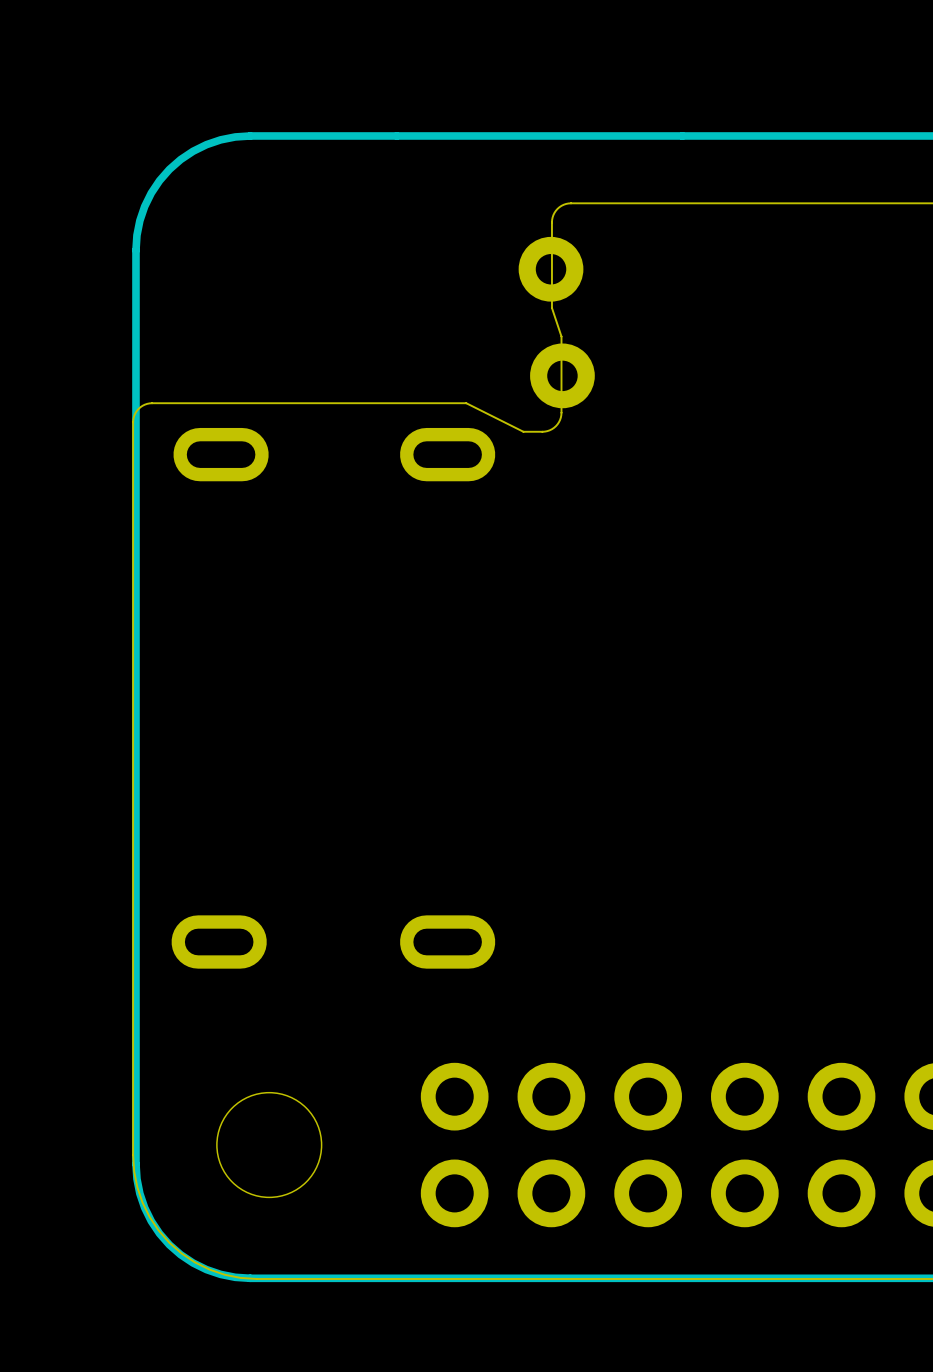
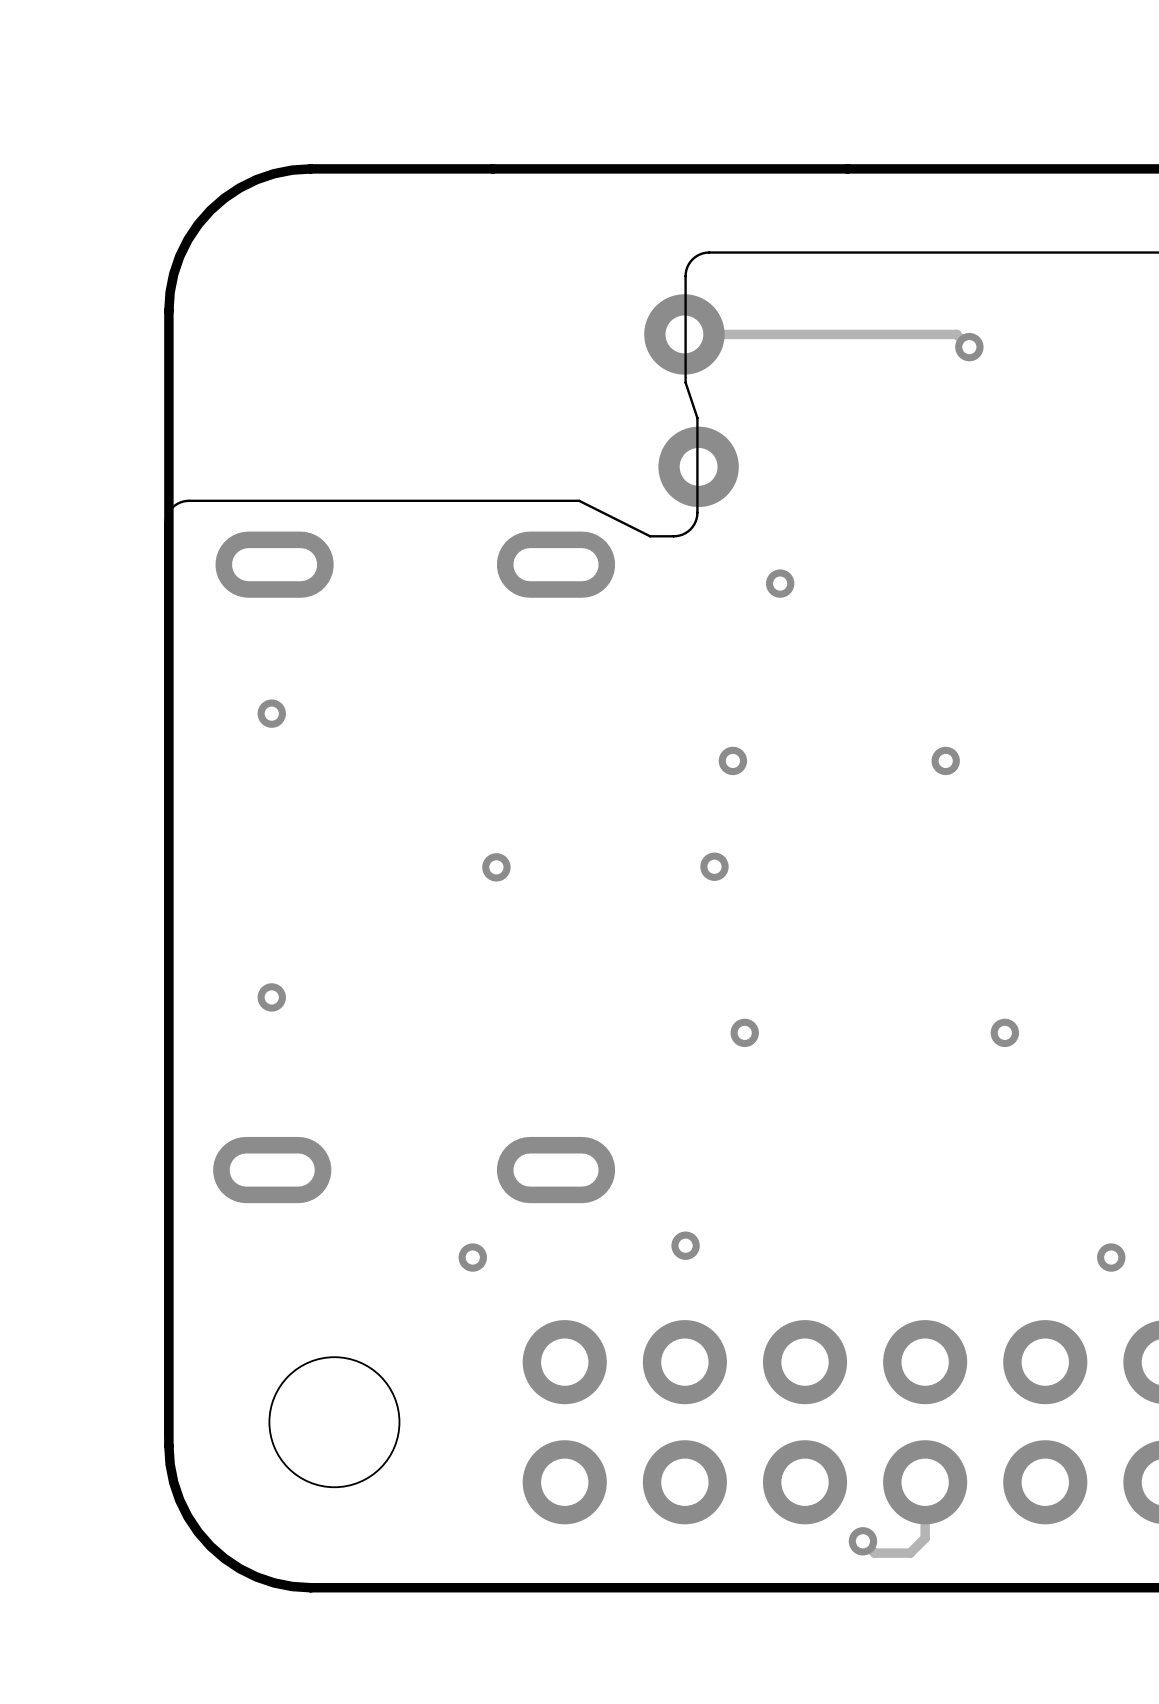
track: none -> (714, 334) (956, 334) (969, 347)
via: none -> (969, 347)
via: none -> (780, 583)
via: none -> (271, 713)
via: none -> (732, 760)
via: none -> (945, 760)
via: none -> (714, 866)
via: none -> (496, 867)
via: none -> (271, 997)
via: none -> (744, 1032)
via: none -> (1004, 1032)
via: none -> (685, 1245)
via: none -> (472, 1257)
via: none -> (1111, 1257)
track: none -> (925, 1482) (925, 1538) (910, 1553) (874, 1553) (862, 1541)
via: none -> (862, 1541)

